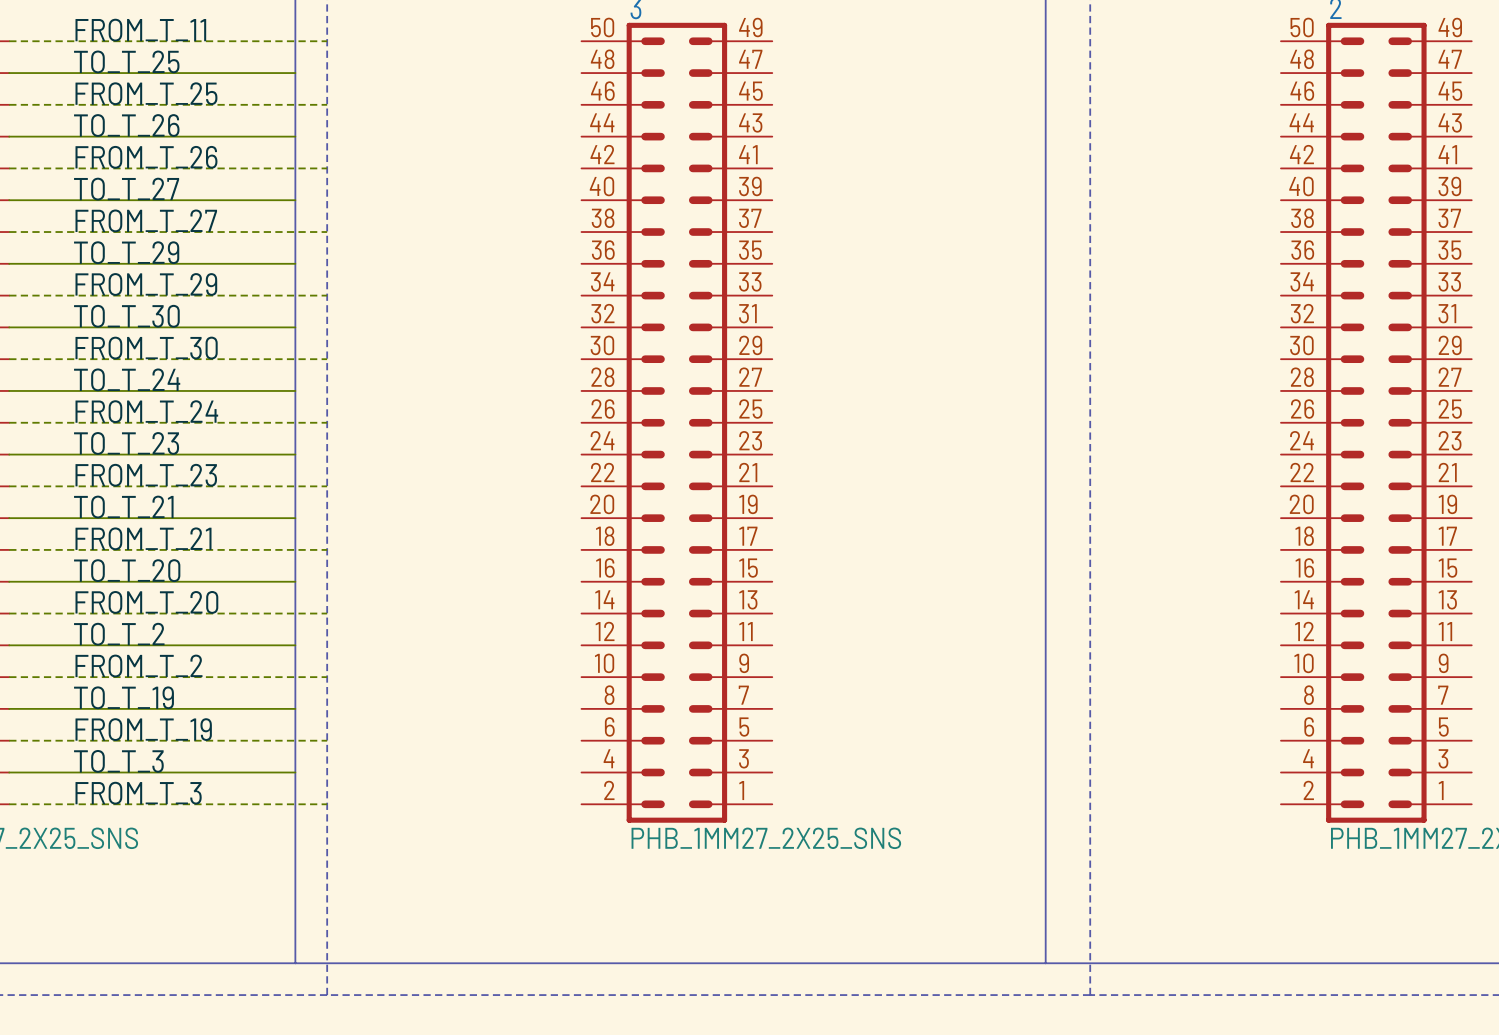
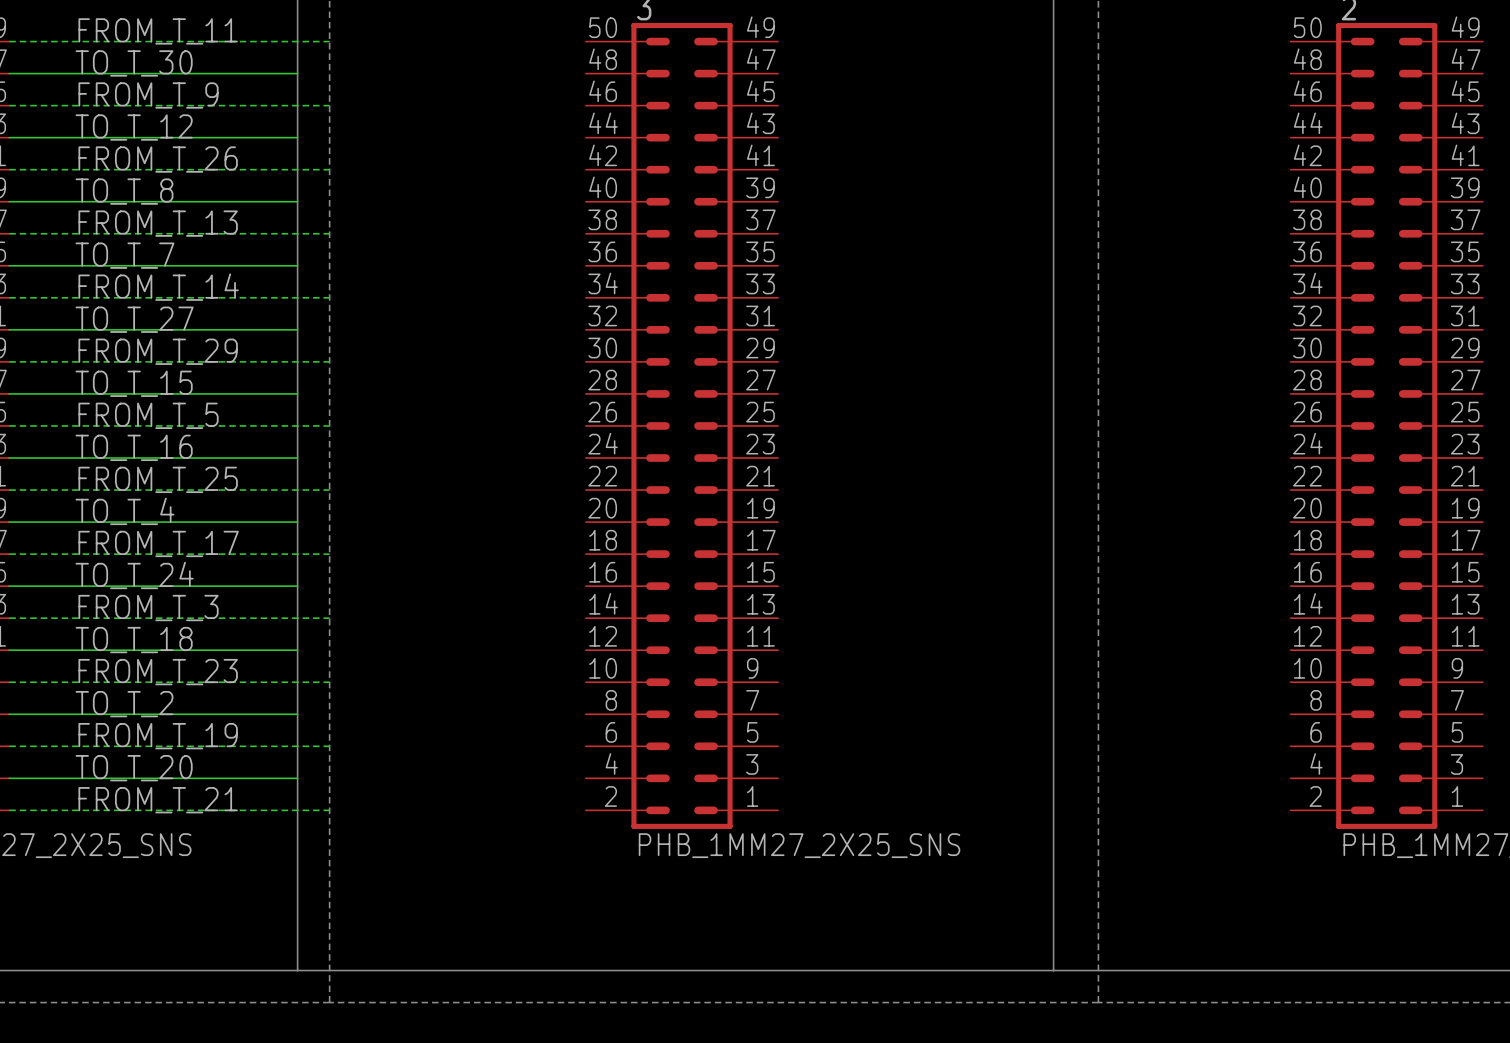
label: TO_T_25 (126, 61) -> TO_T_30 (134, 63)
label: FROM_T_25 (146, 93) -> FROM_T_9 (148, 95)
label: TO_T_26 (126, 125) -> TO_T_12 (134, 127)
label: TO_T_27 (126, 189) -> TO_T_8 (124, 191)
label: FROM_T_27 (146, 220) -> FROM_T_13 (158, 223)
label: TO_T_29 (126, 252) -> TO_T_7 (124, 255)
label: FROM_T_29 (146, 284) -> FROM_T_14 (158, 287)
label: TO_T_30 (126, 316) -> TO_T_27 (134, 319)
label: FROM_T_30 (146, 348) -> FROM_T_29 (158, 351)
label: TO_T_24 (127, 379) -> TO_T_15 (134, 383)
label: FROM_T_24 (146, 411) -> FROM_T_5 (148, 415)
label: TO_T_23 (126, 443) -> TO_T_16 (134, 447)
label: FROM_T_23 (146, 475) -> FROM_T_25 (158, 479)
label: TO_T_21 (123, 507) -> TO_T_4 (124, 511)
label: FROM_T_21 (143, 538) -> FROM_T_17 (158, 543)
label: TO_T_20 (127, 570) -> TO_T_24 (134, 575)
label: FROM_T_20 (146, 602) -> FROM_T_3 (148, 608)
label: TO_T_2 (119, 634) -> TO_T_18 (134, 640)
label: FROM_T_2 (138, 665) -> FROM_T_23 (158, 672)
label: TO_T_19 (123, 697) -> TO_T_2 (124, 704)
label: TO_T_3 (118, 761) -> TO_T_20 (134, 768)
label: FROM_T_3 (138, 793) -> FROM_T_21 (158, 800)

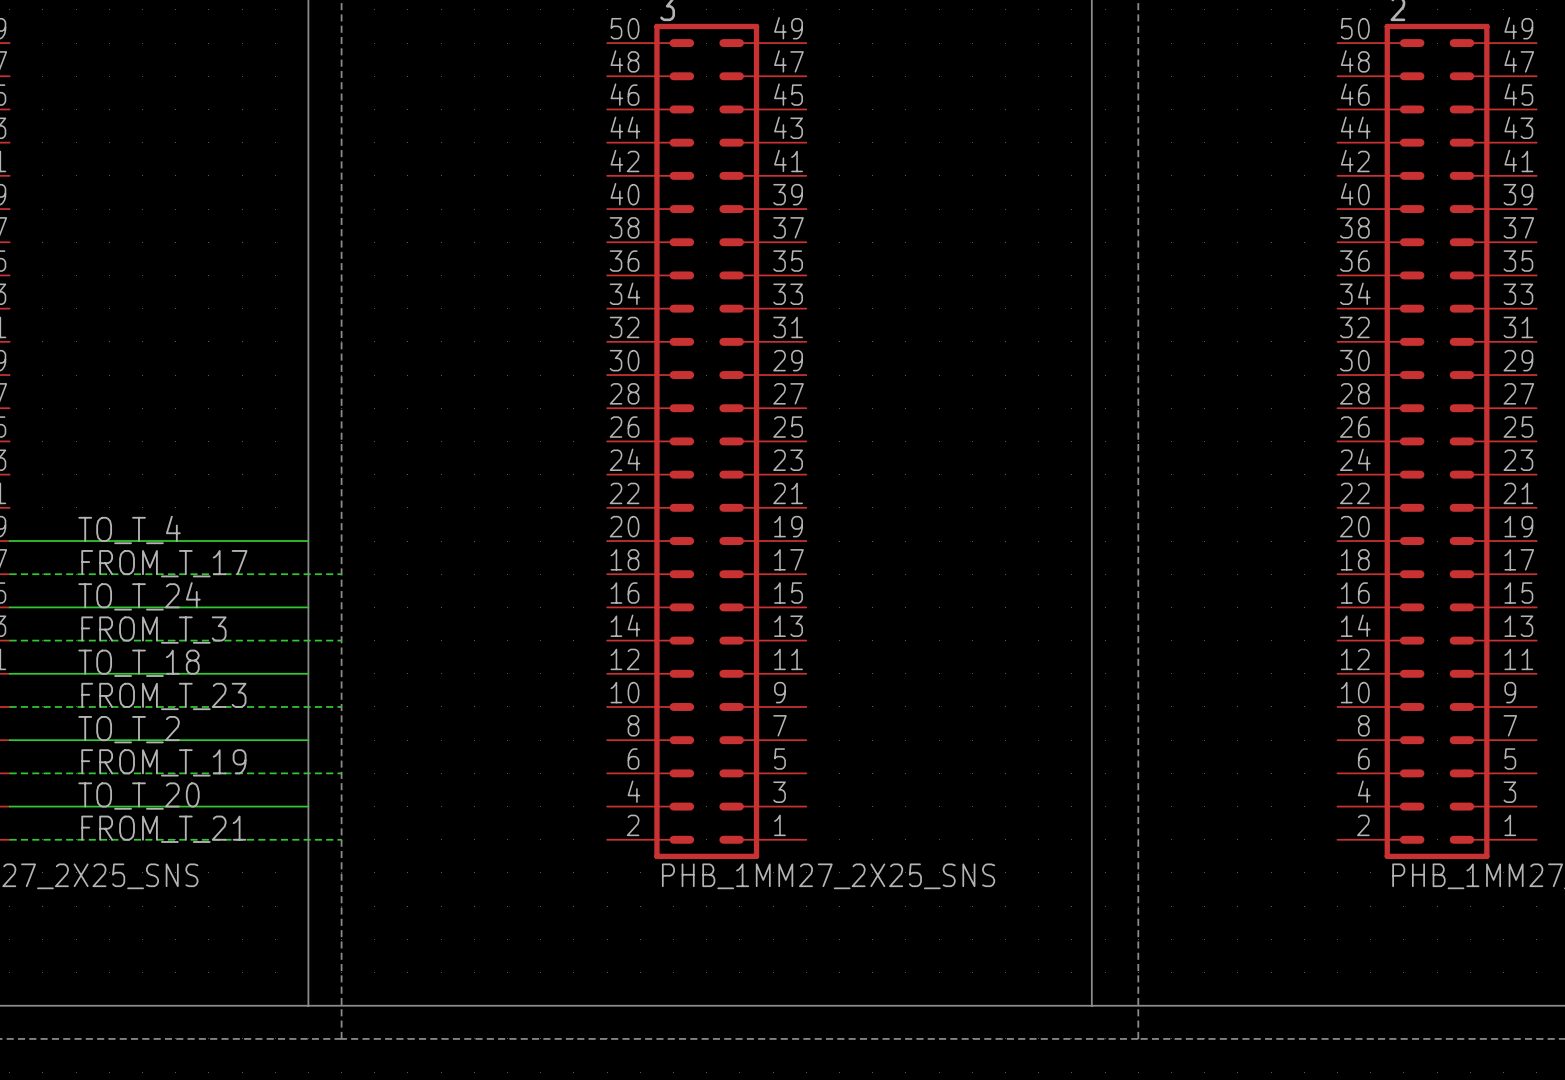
label: FROM_T_11 (158, 31) -> none
wire: (9, 41) (329, 41) -> none
label: TO_T_30 (134, 63) -> none
wire: (9, 73) (297, 73) -> none
label: FROM_T_9 (148, 95) -> none
wire: (9, 105) (329, 105) -> none
label: TO_T_12 (134, 127) -> none
wire: (9, 137) (297, 137) -> none
label: FROM_T_26 (158, 159) -> none
wire: (9, 169) (329, 169) -> none
label: TO_T_8 (124, 191) -> none
wire: (9, 201) (297, 201) -> none
label: FROM_T_13 (158, 223) -> none
wire: (9, 233) (329, 233) -> none
label: TO_T_7 (124, 255) -> none
wire: (9, 265) (297, 265) -> none
label: FROM_T_14 (158, 287) -> none
wire: (9, 297) (329, 297) -> none
label: TO_T_27 (134, 319) -> none
wire: (9, 329) (297, 329) -> none
label: FROM_T_29 (158, 351) -> none
wire: (9, 361) (329, 361) -> none
label: TO_T_15 (134, 383) -> none
wire: (9, 393) (297, 393) -> none
label: FROM_T_5 (148, 415) -> none
wire: (9, 425) (329, 425) -> none
label: TO_T_16 (134, 447) -> none
wire: (9, 457) (297, 457) -> none
label: FROM_T_25 (158, 479) -> none
wire: (9, 490) (329, 490) -> none

